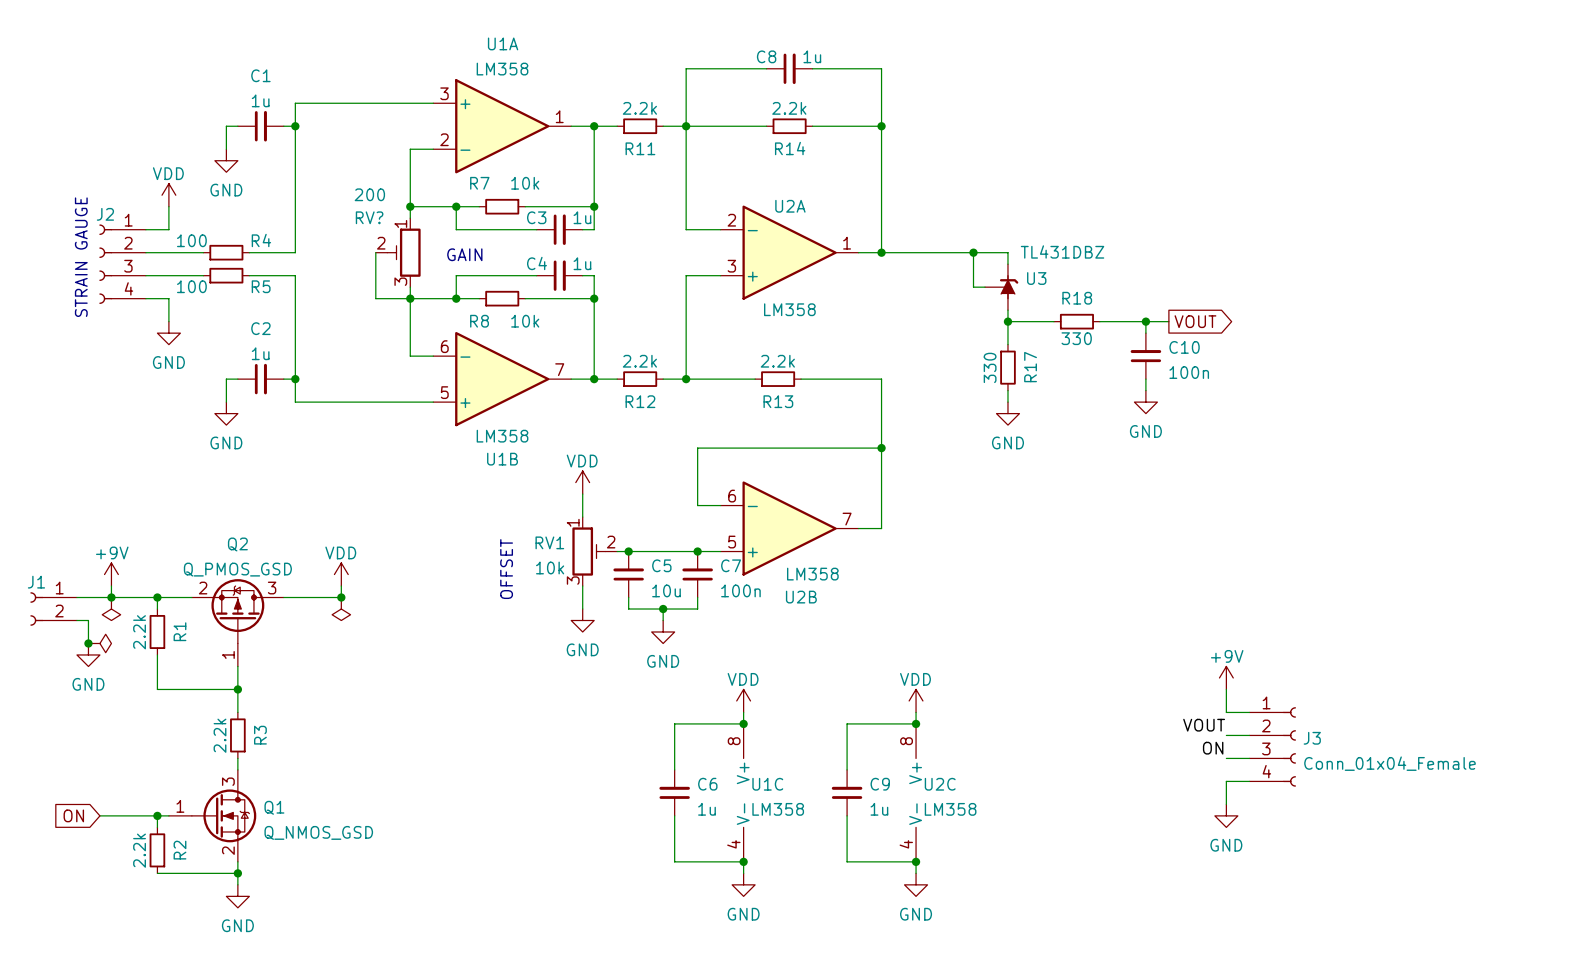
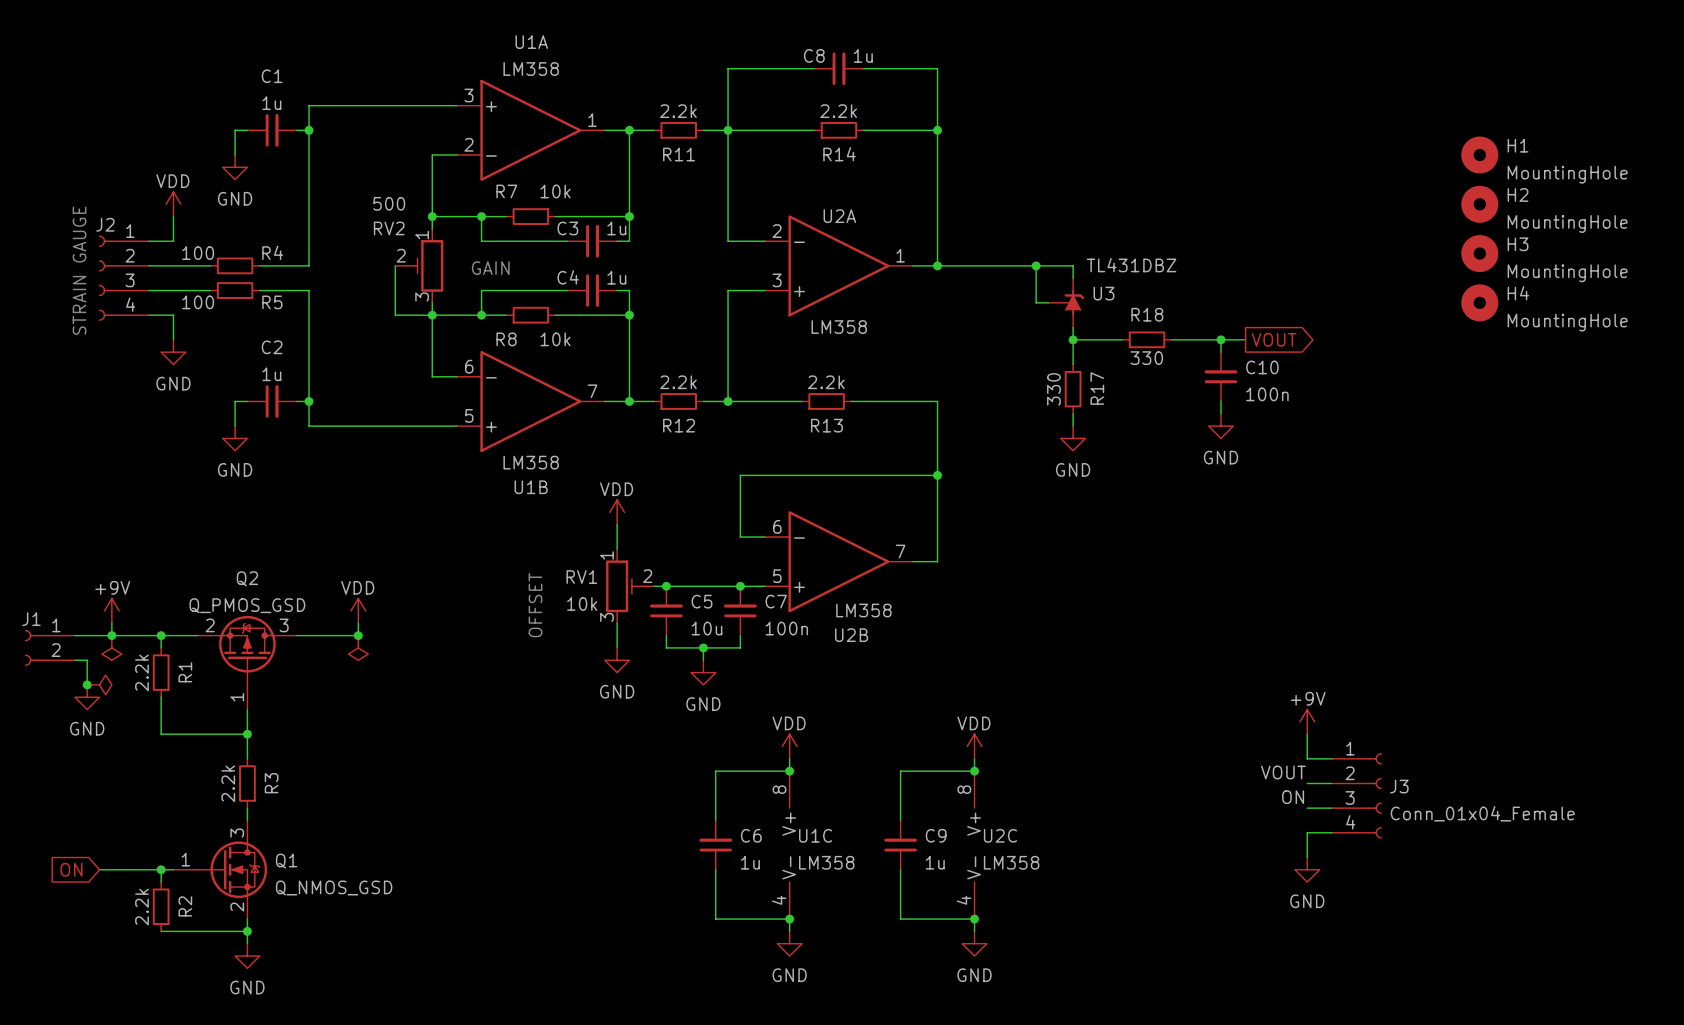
H1: none -> MountingHole (1479, 154)
RV? value: 200 (369, 194) -> 500 (389, 203)
H2: none -> MountingHole (1479, 204)
RV? name: RV? (369, 217) -> RV2 (389, 228)
H3: none -> MountingHole (1479, 253)
H4: none -> MountingHole (1479, 302)

